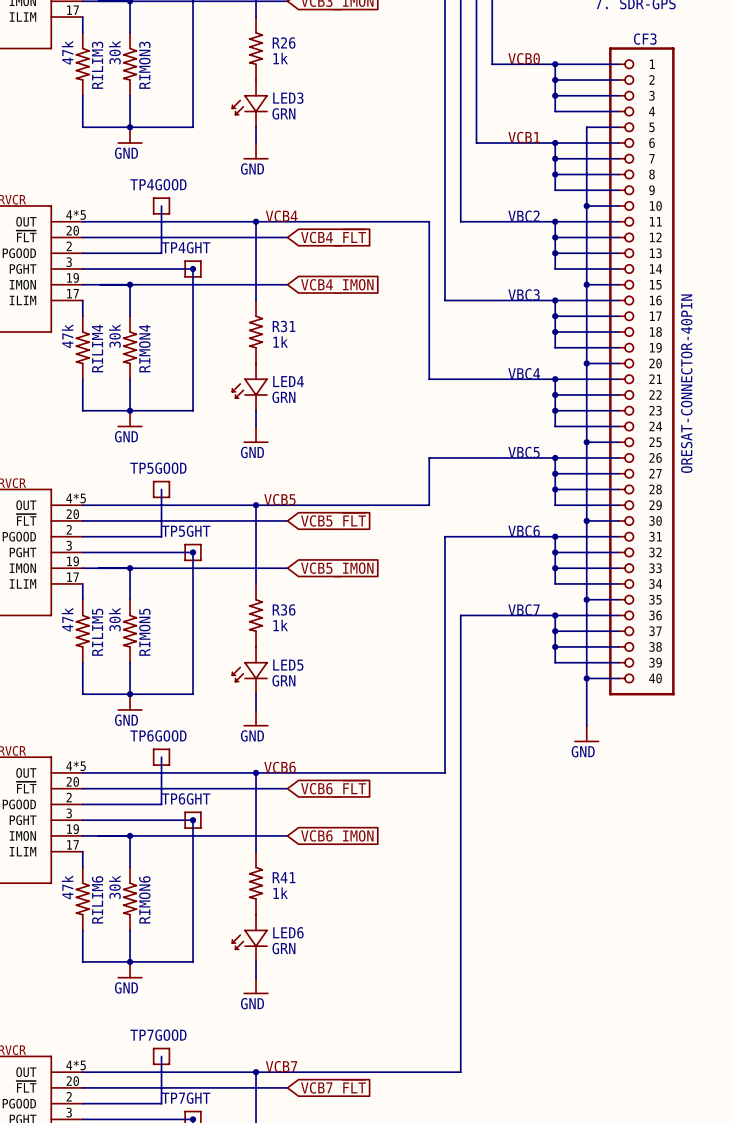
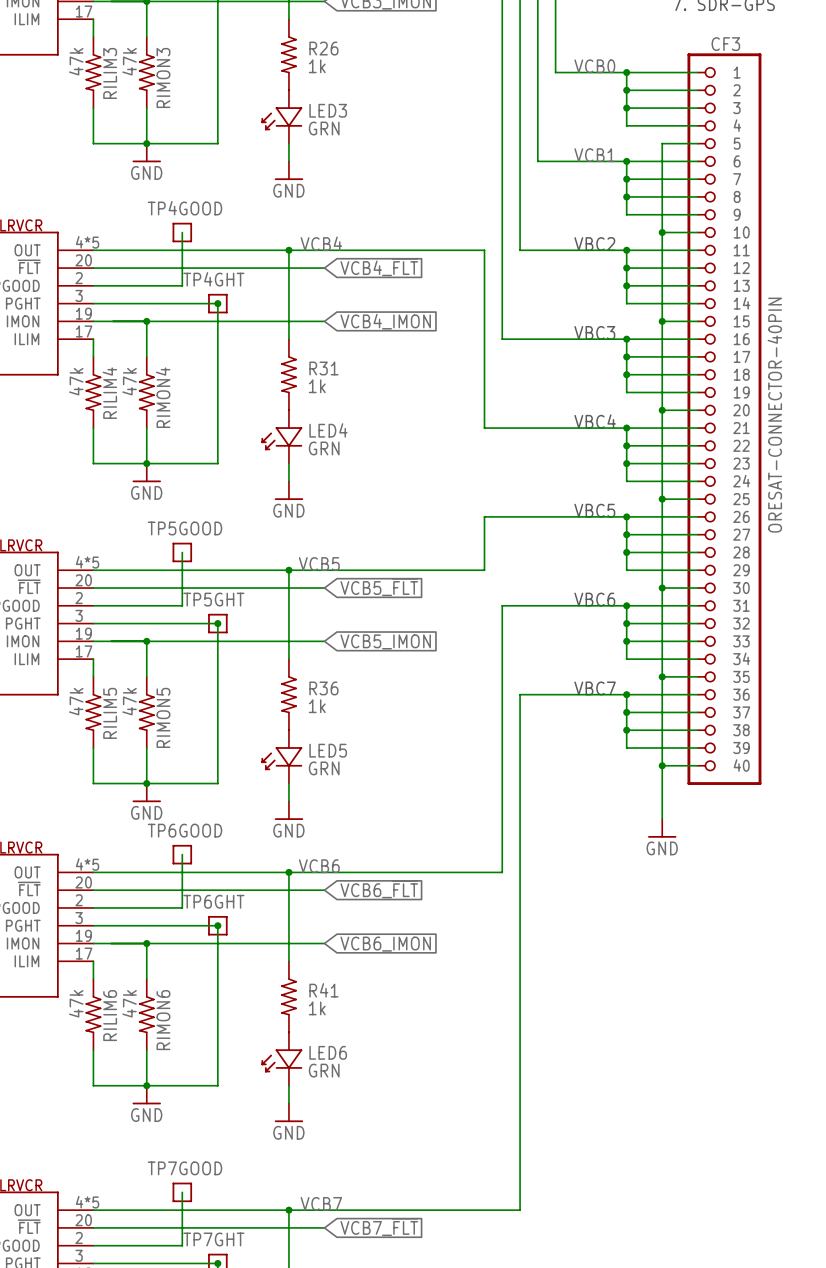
RIMON3 value: 30k (114, 52) -> 47k (129, 61)
RIMON4 value: 30k (114, 336) -> 47k (129, 381)
RIMON5 value: 30k (114, 619) -> 47k (129, 701)
RIMON6 value: 30k (114, 887) -> 47k (129, 1003)

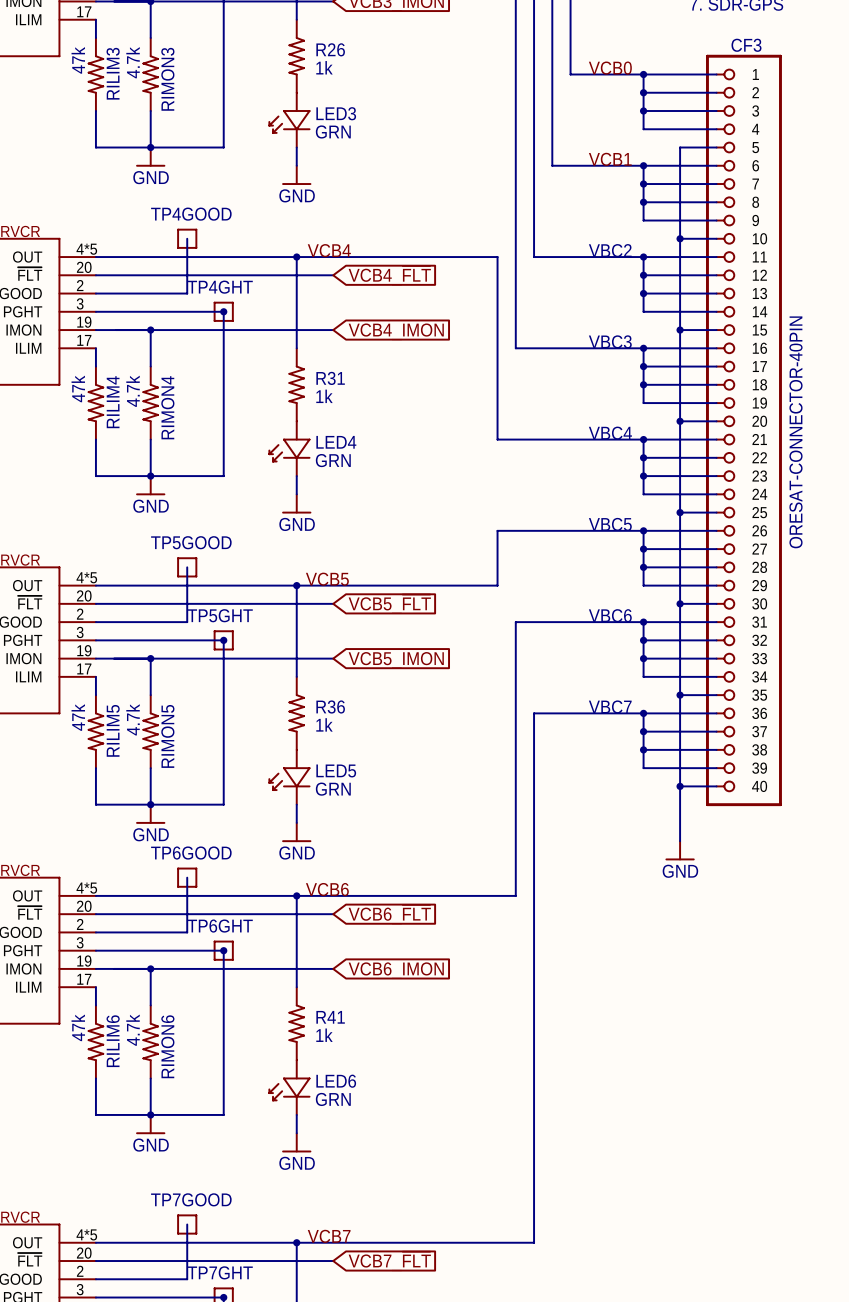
RIMON3 value: 47k (129, 61) -> 4.7k (133, 62)
RIMON4 value: 47k (129, 381) -> 4.7k (133, 391)
RIMON5 value: 47k (129, 701) -> 4.7k (133, 719)
RIMON6 value: 47k (129, 1003) -> 4.7k (133, 1030)

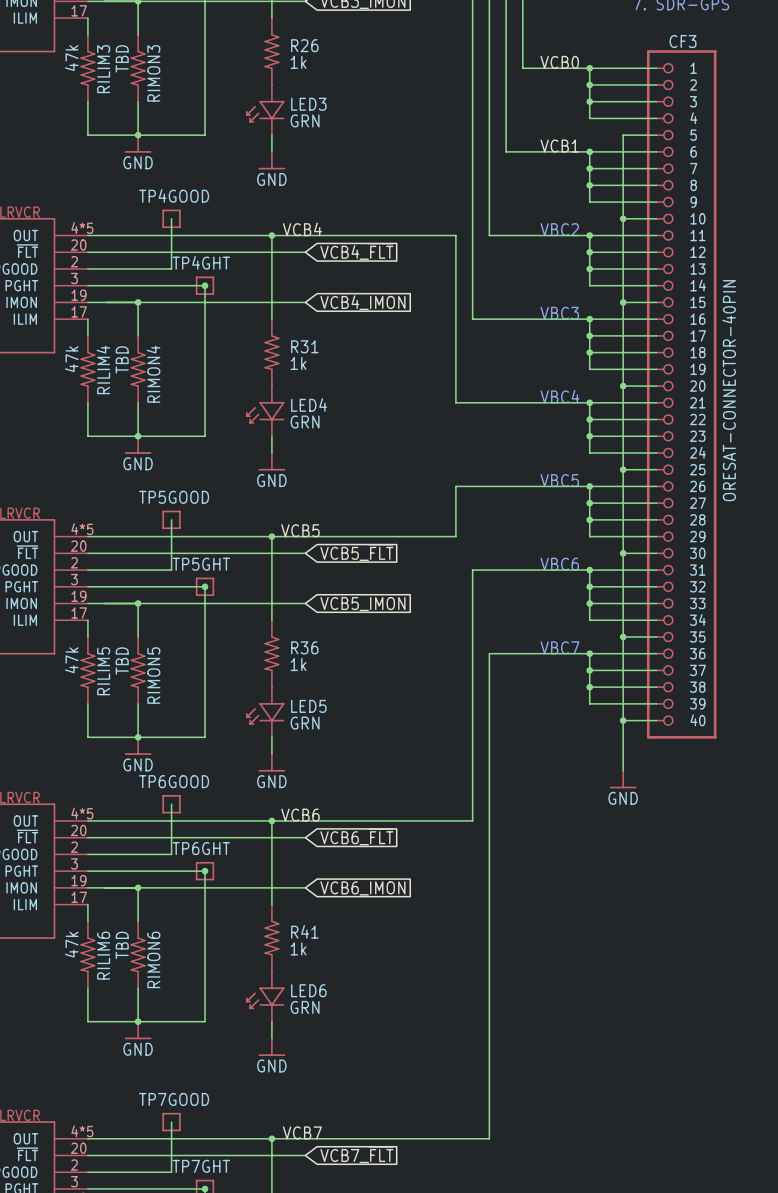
RIMON3 value: 4.7k (133, 62) -> TBD (122, 58)
RIMON4 value: 4.7k (133, 391) -> TBD (122, 359)
RIMON5 value: 4.7k (133, 719) -> TBD (122, 661)
RIMON6 value: 4.7k (133, 1030) -> TBD (122, 945)

